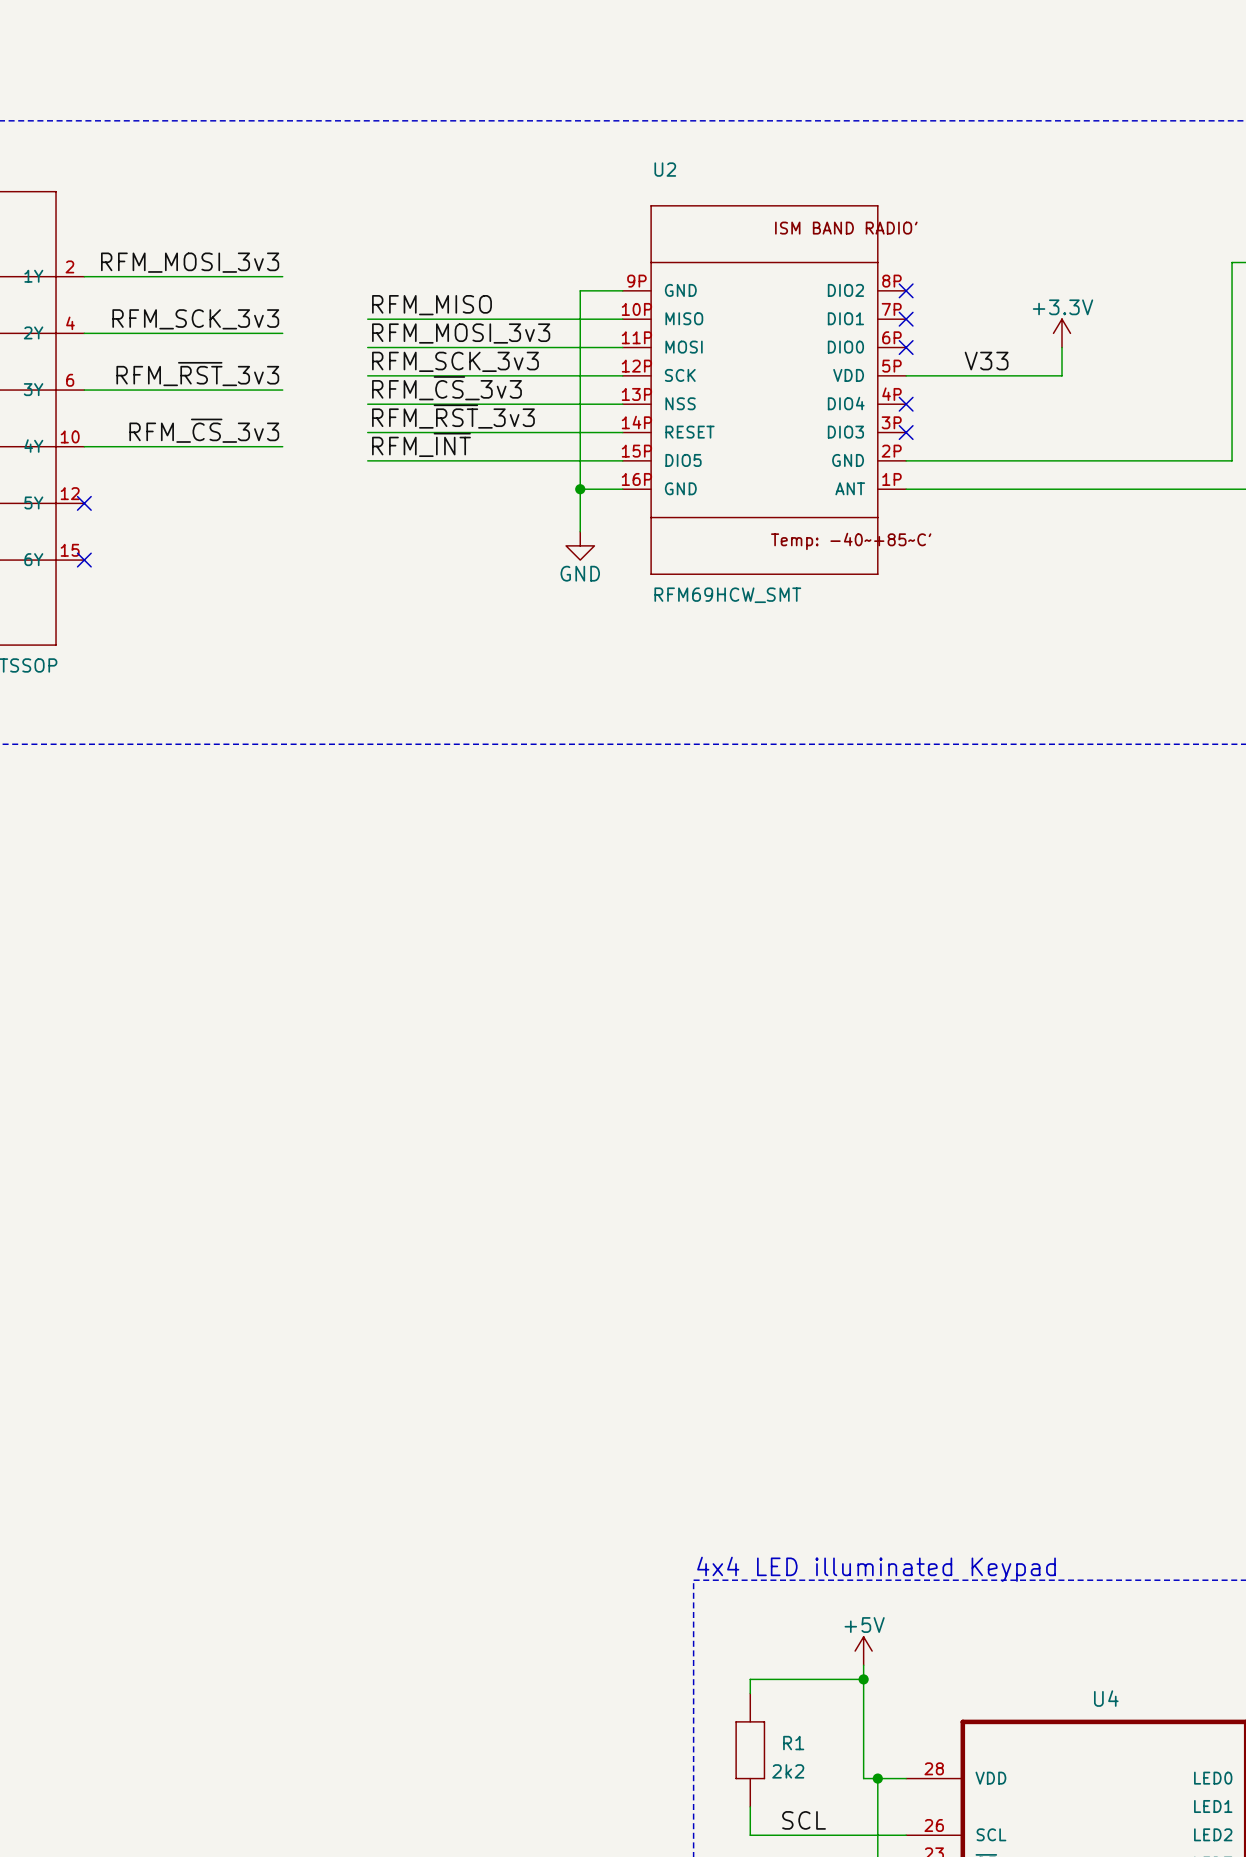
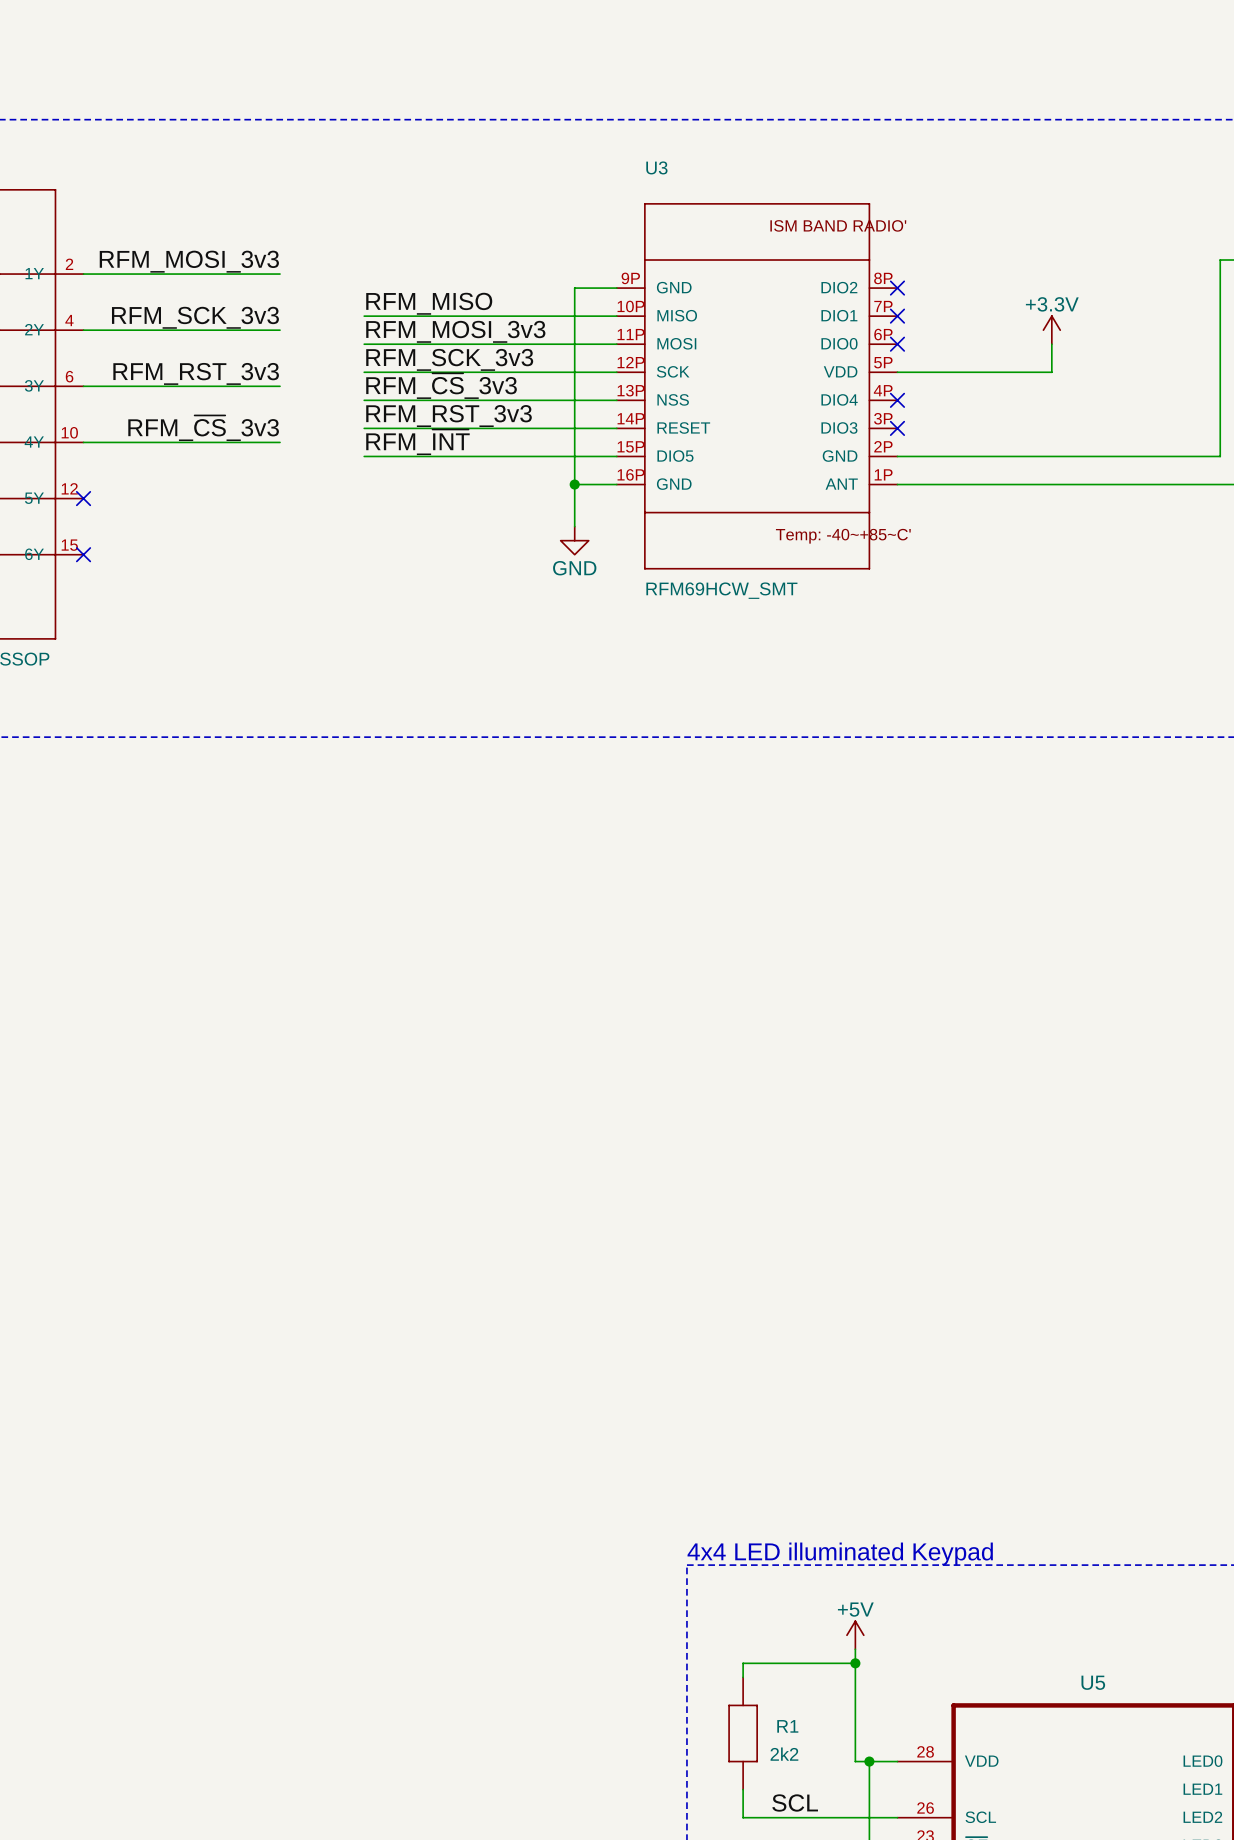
U2 name: U2 (665, 169) -> U3 (656, 167)
label: V33 (986, 361) -> none
label: RFM_~{RST}_3v3 (197, 374) -> RFM_RST_3v3 (196, 373)
label: RFM_~{RST}_3v3 (453, 416) -> RFM_RST_3v3 (449, 416)
U4 name: U4 (1106, 1698) -> U5 (1093, 1682)

